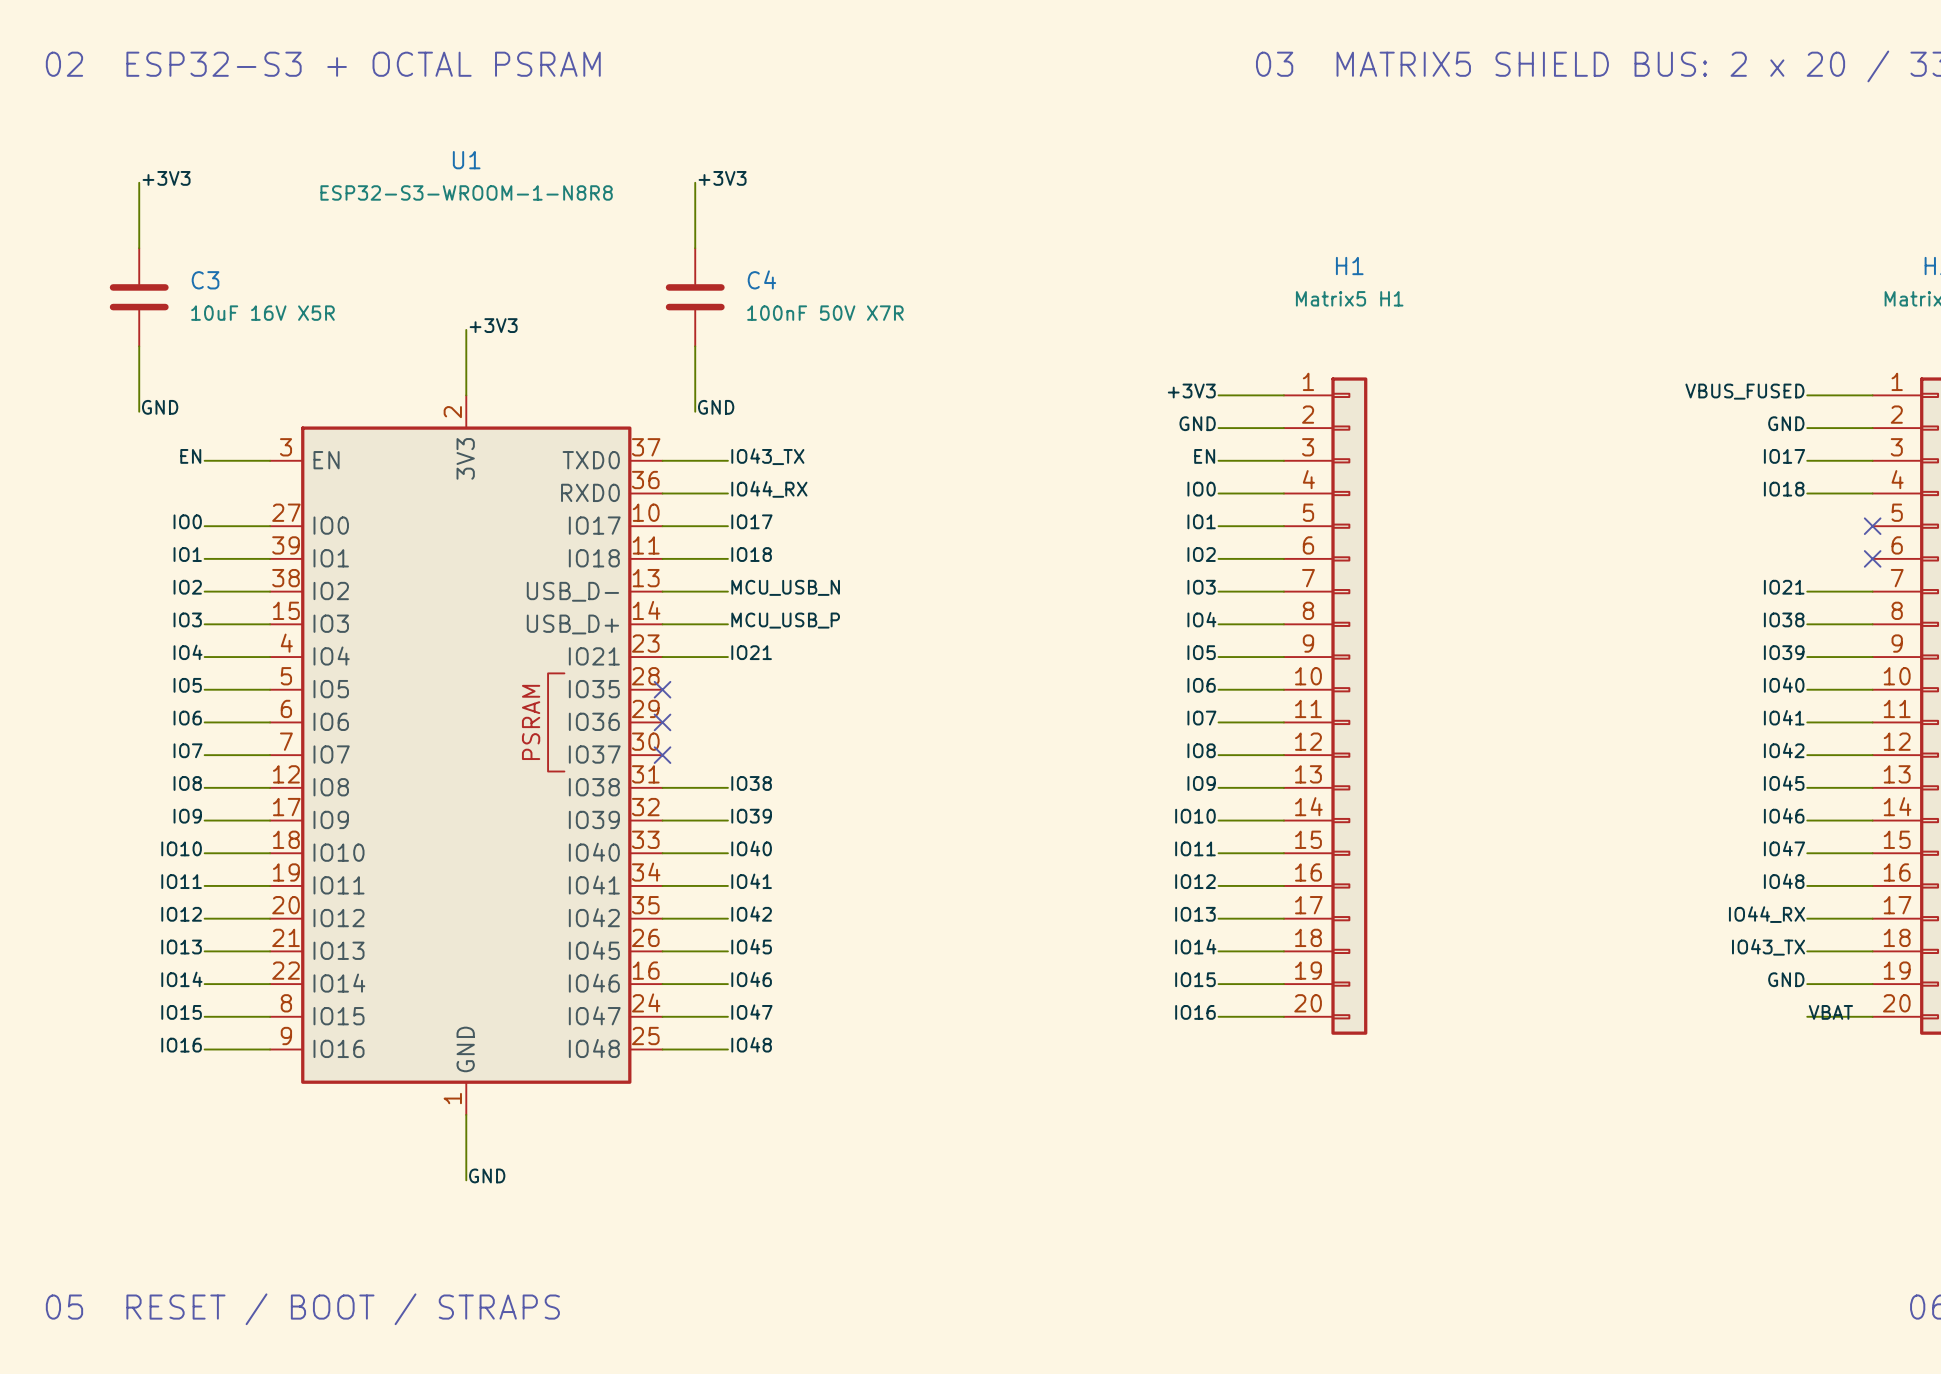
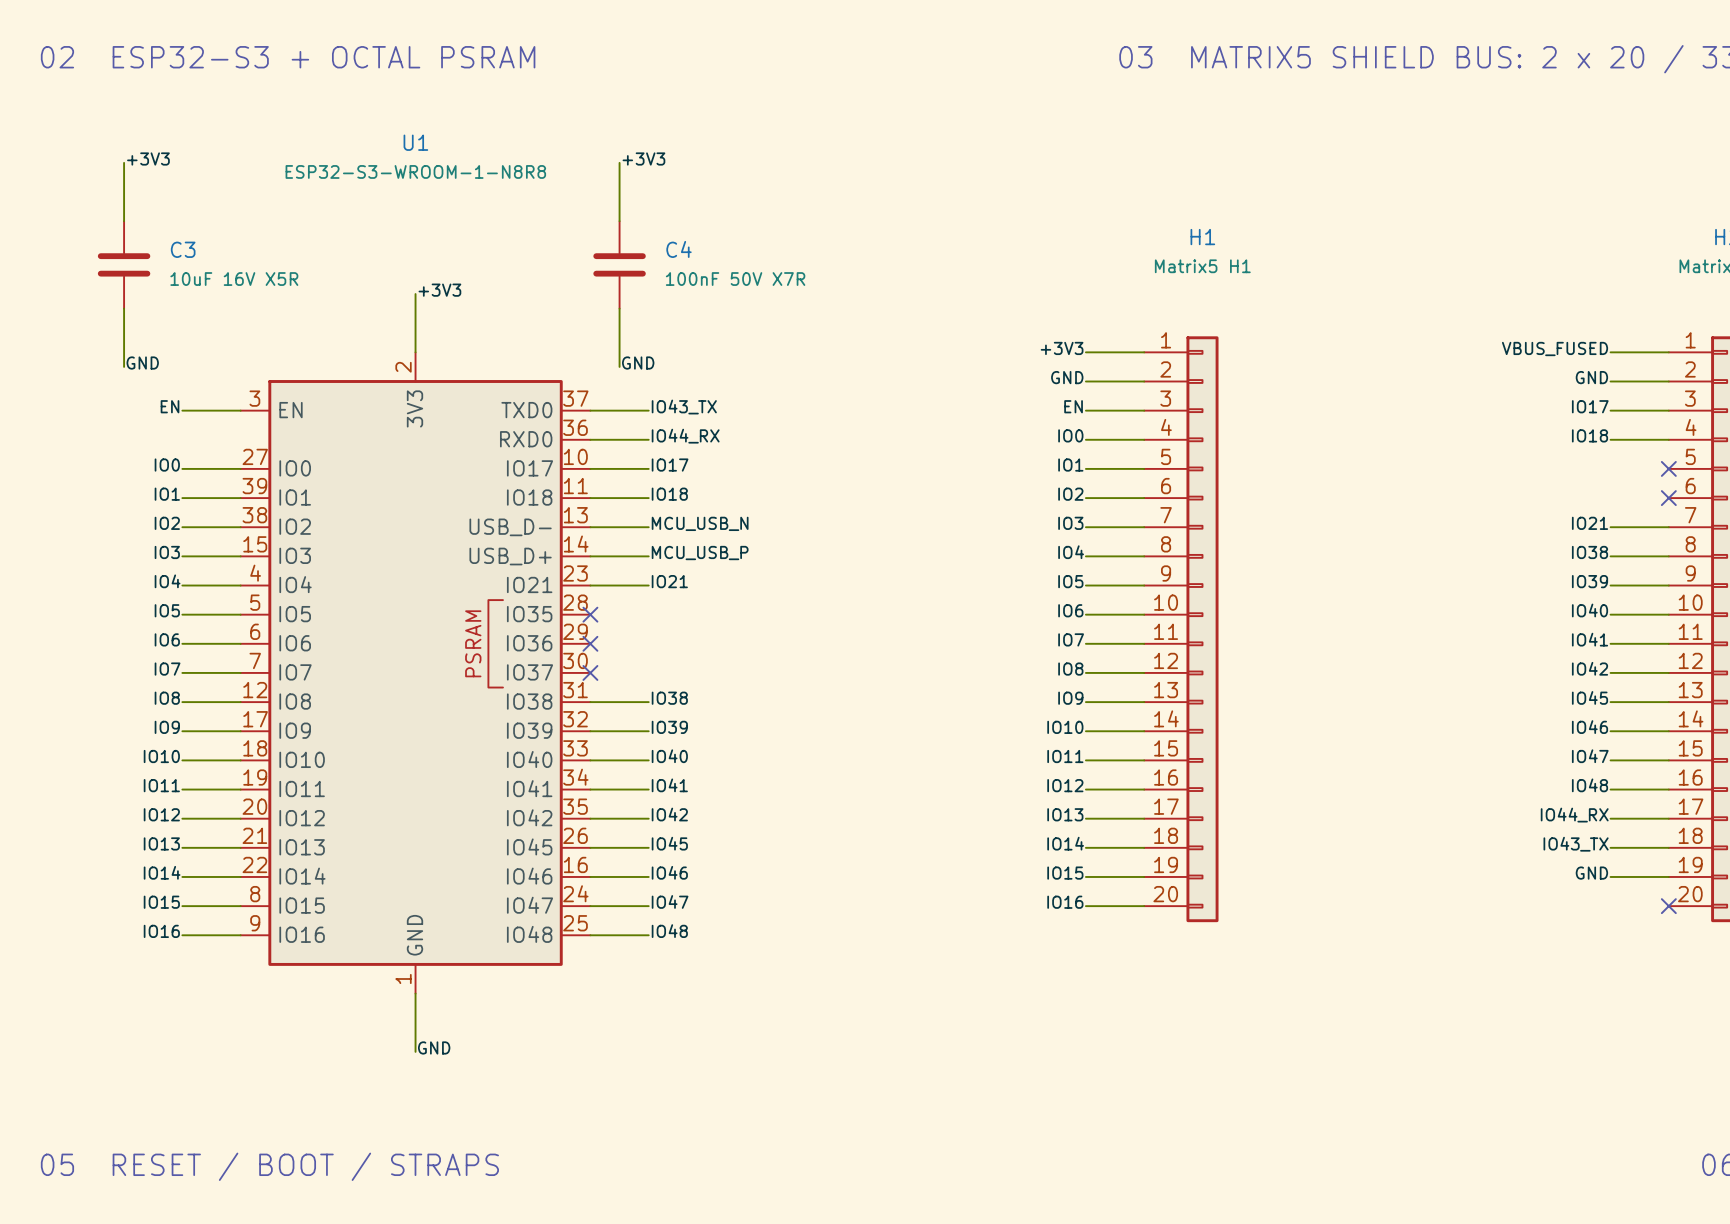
label: VBAT (1830, 1012) -> none
wire: (1807, 1016) (1872, 1016) -> none
no-connect mark: none -> (1668, 906)

